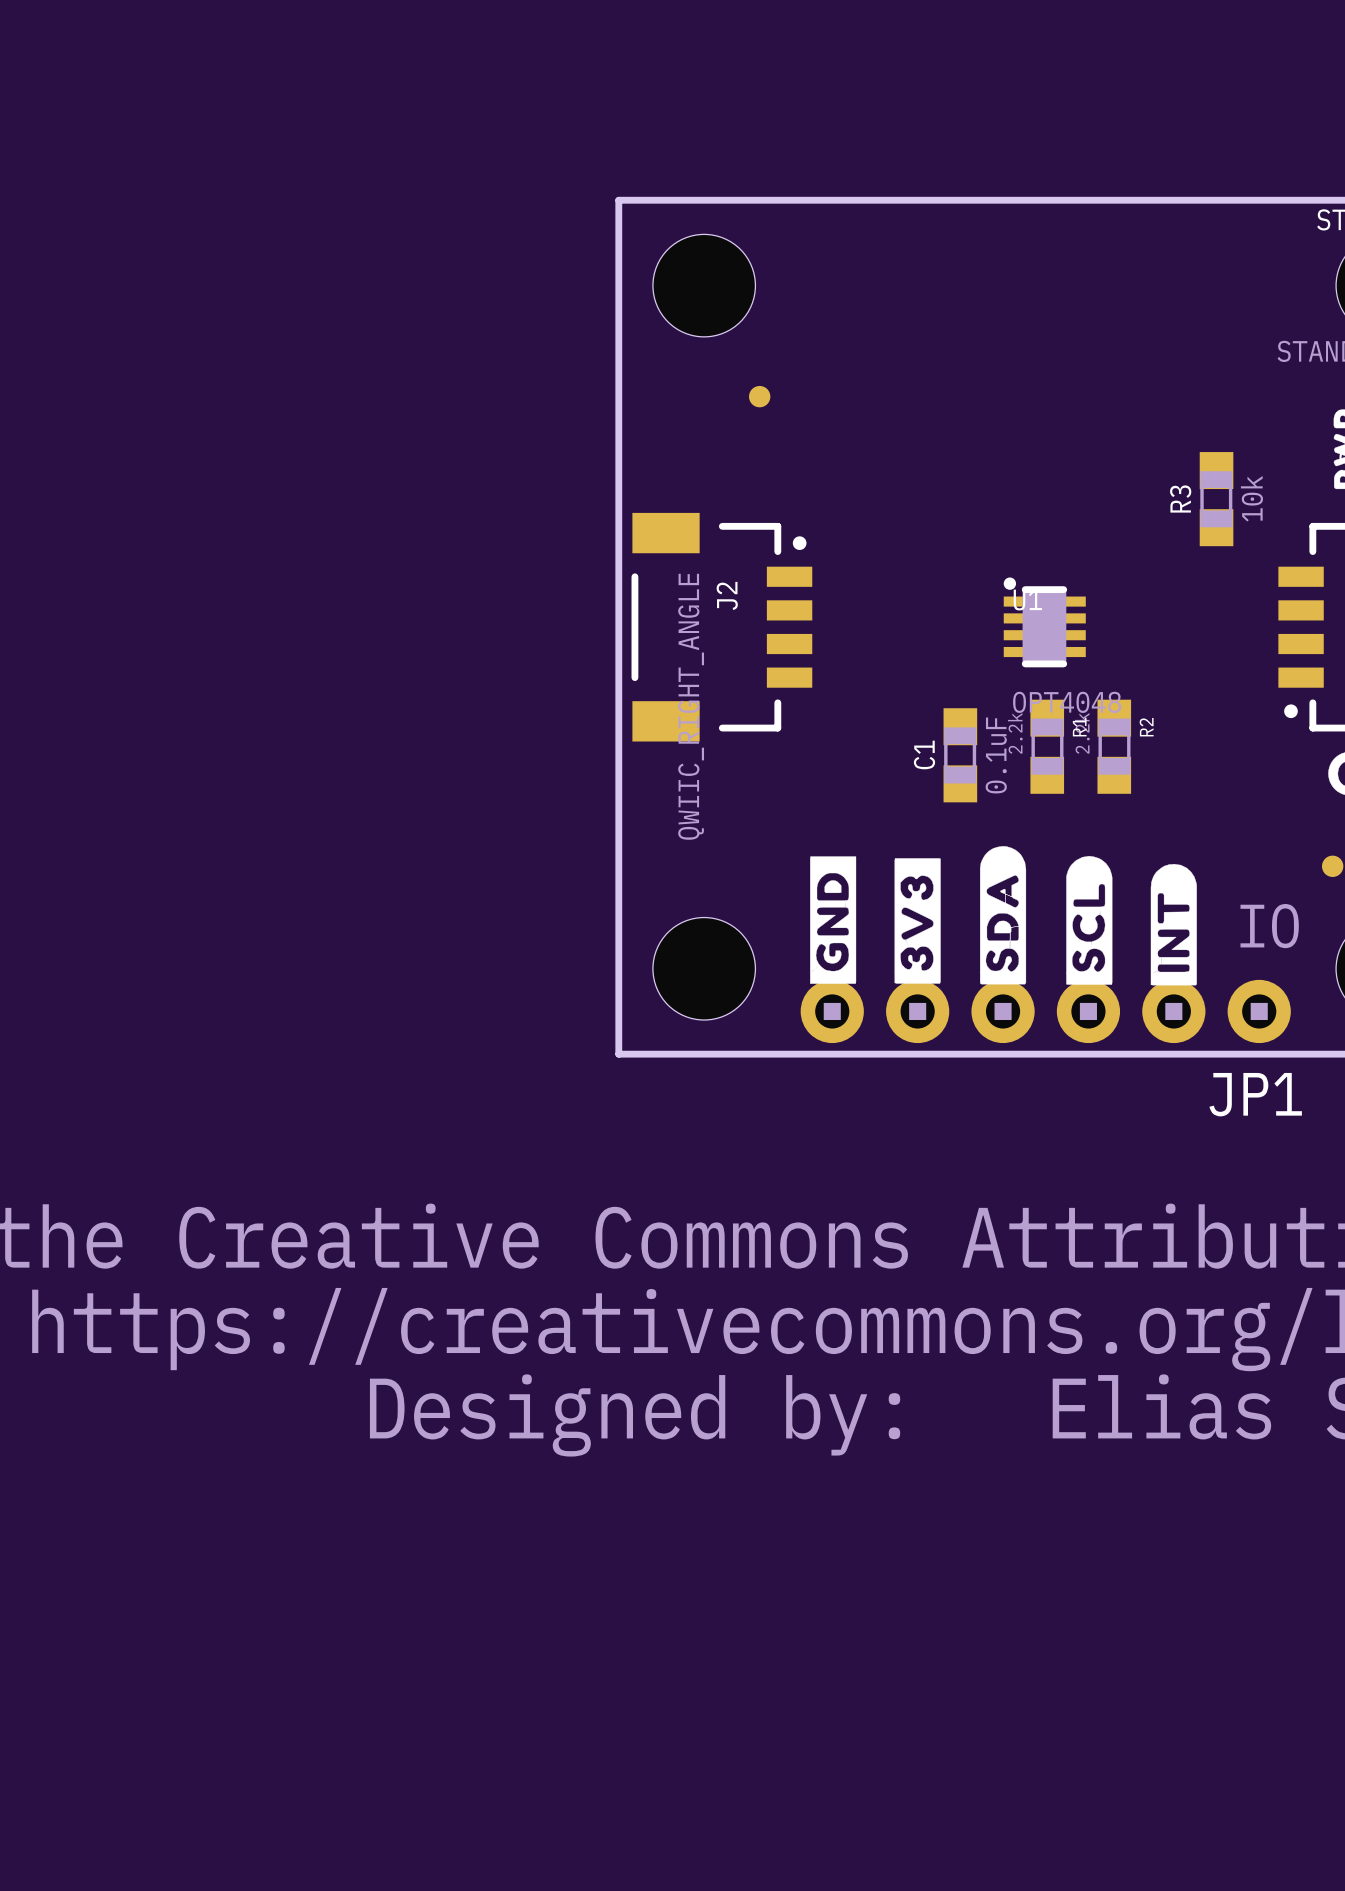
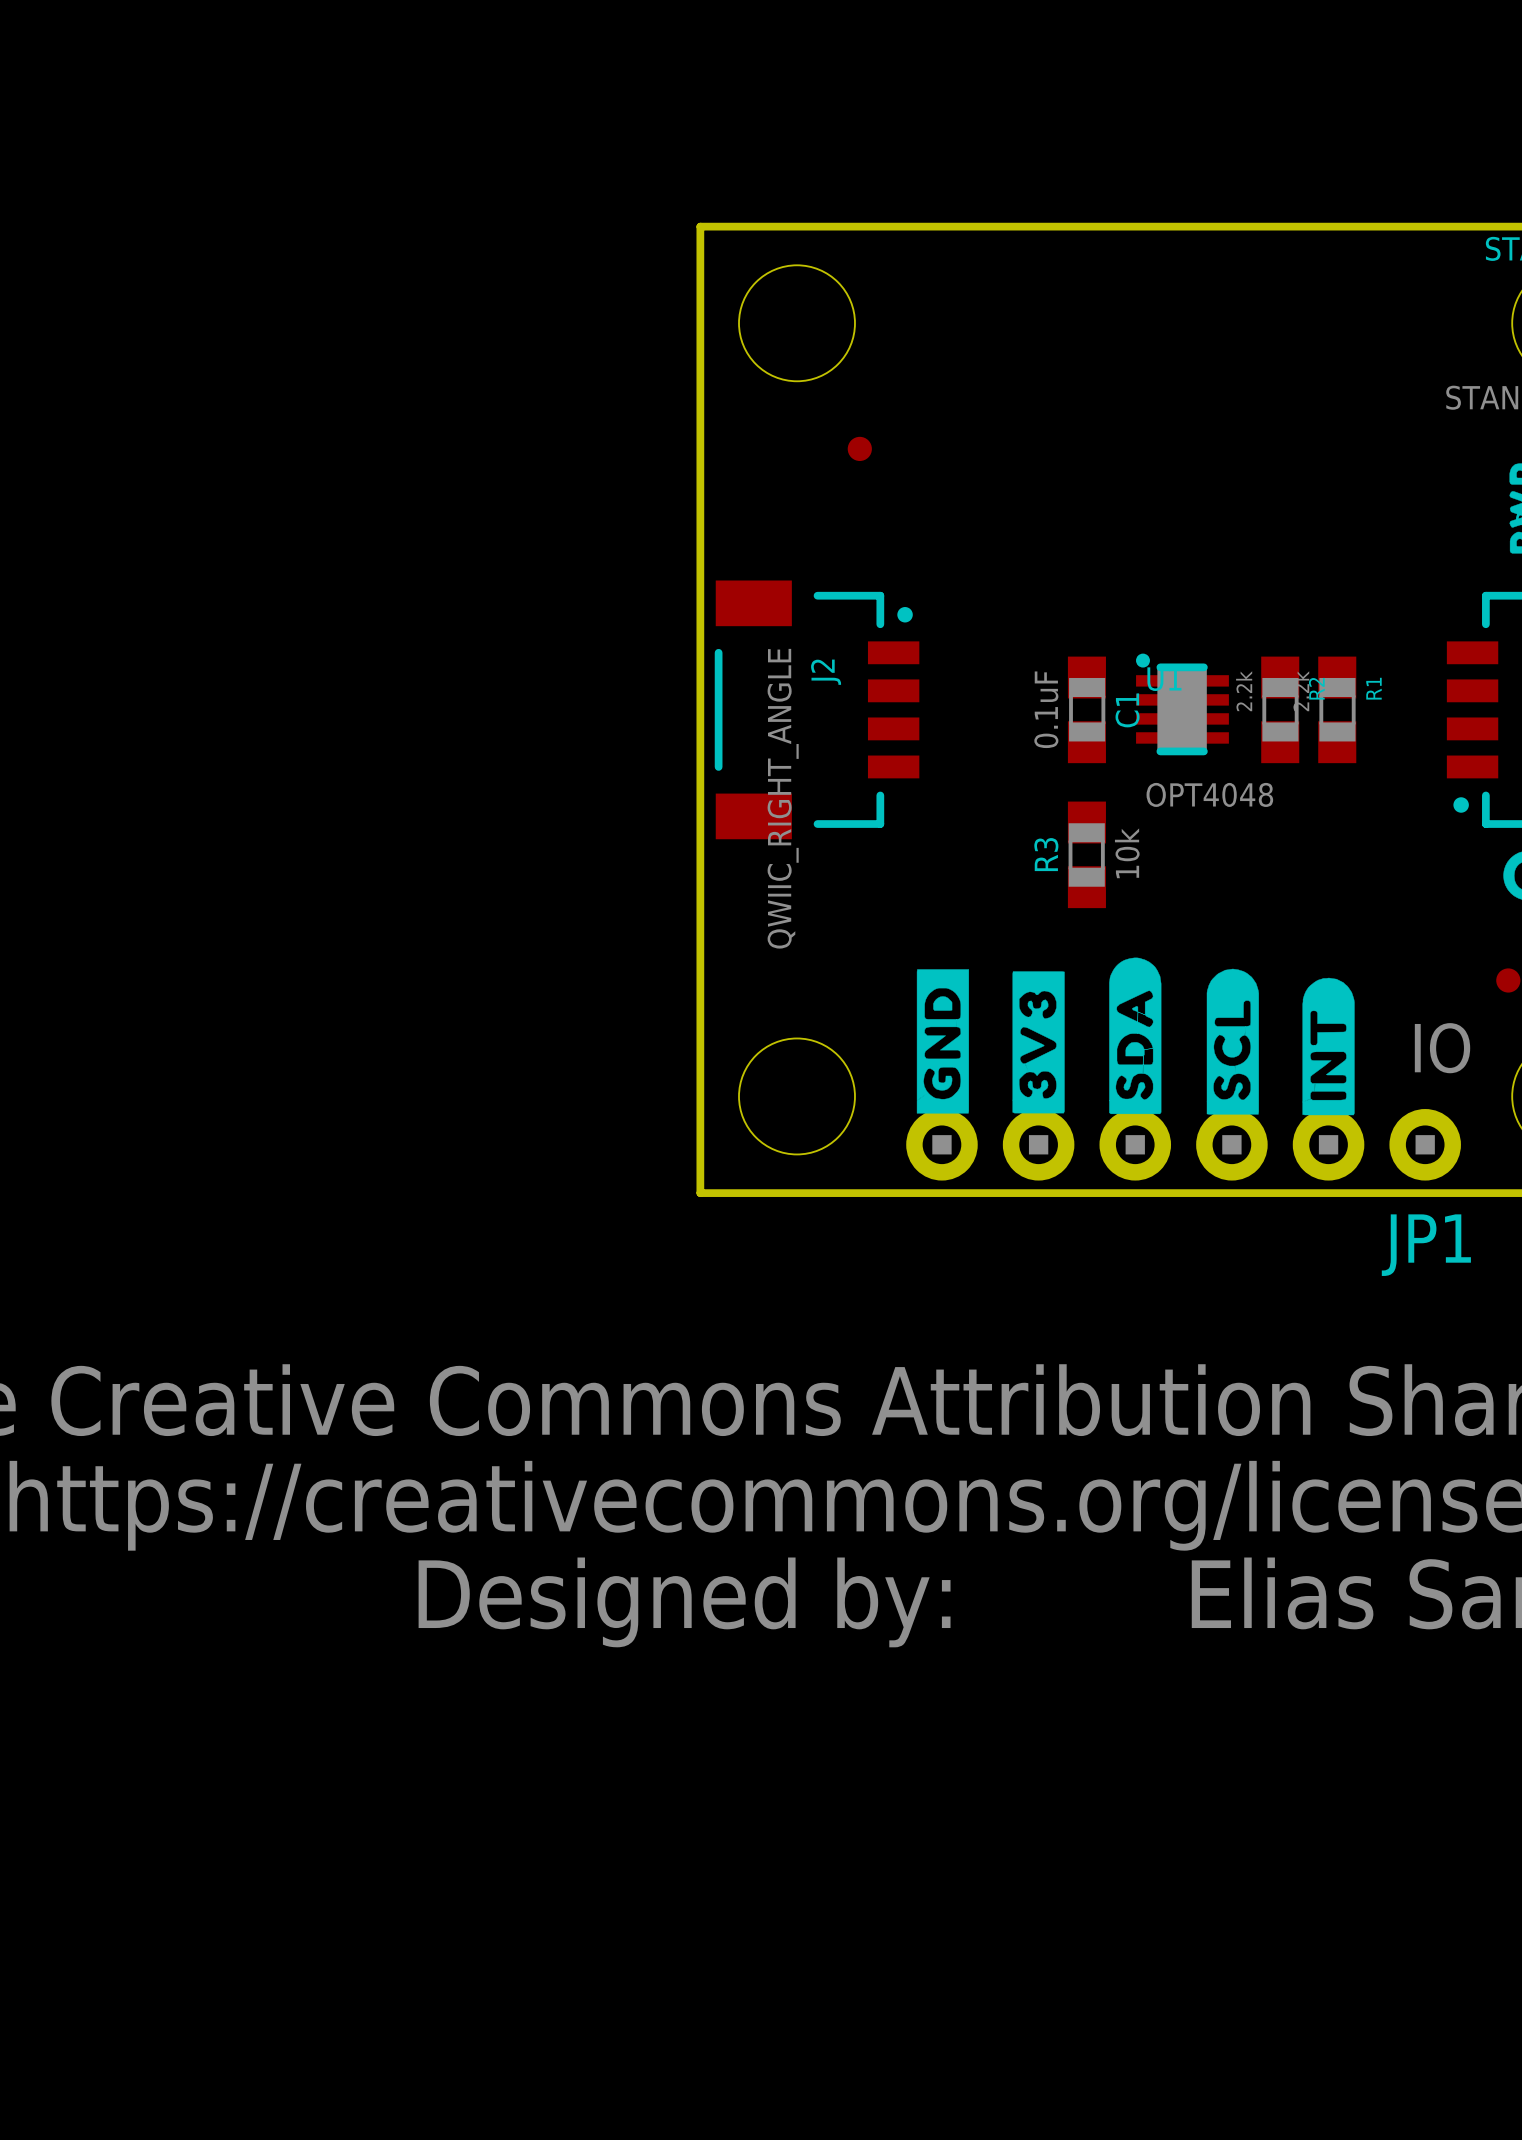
R3: 10k (1216, 499) -> none
C1: none -> 0.1uF (1086, 709)
R1 position: (1047, 746) -> (1337, 709)
R2 position: (1114, 746) -> (1280, 709)
C1 name: C1 (924, 754) -> R3 (1046, 854)
C1 value: 0.1uF (996, 755) -> 10k (1127, 853)

